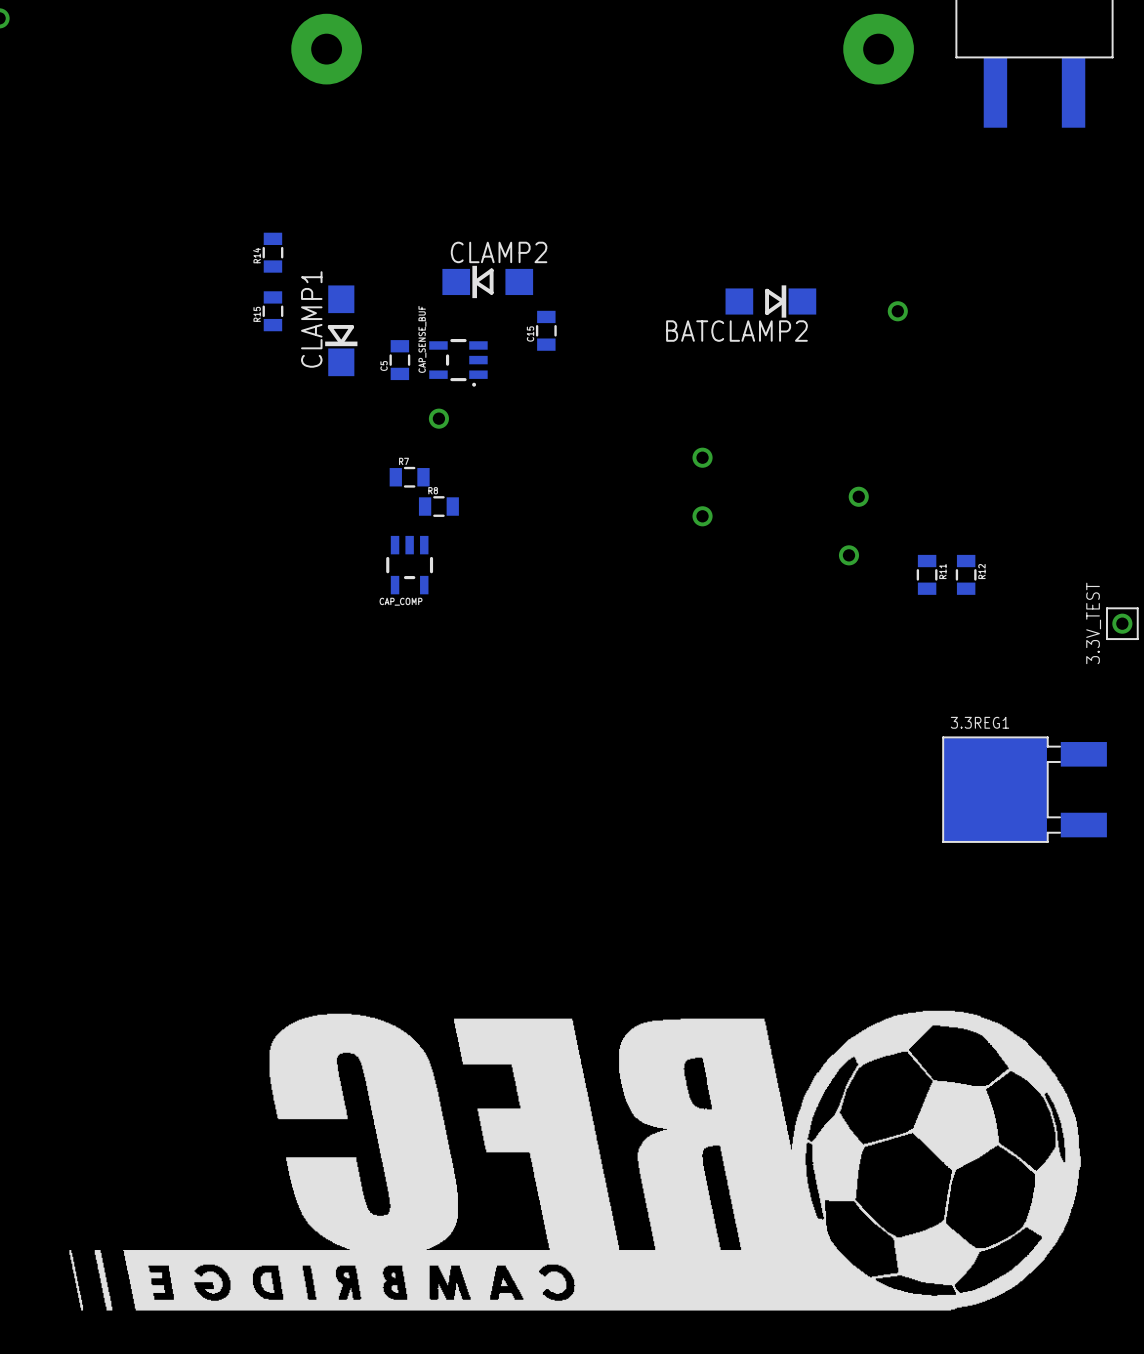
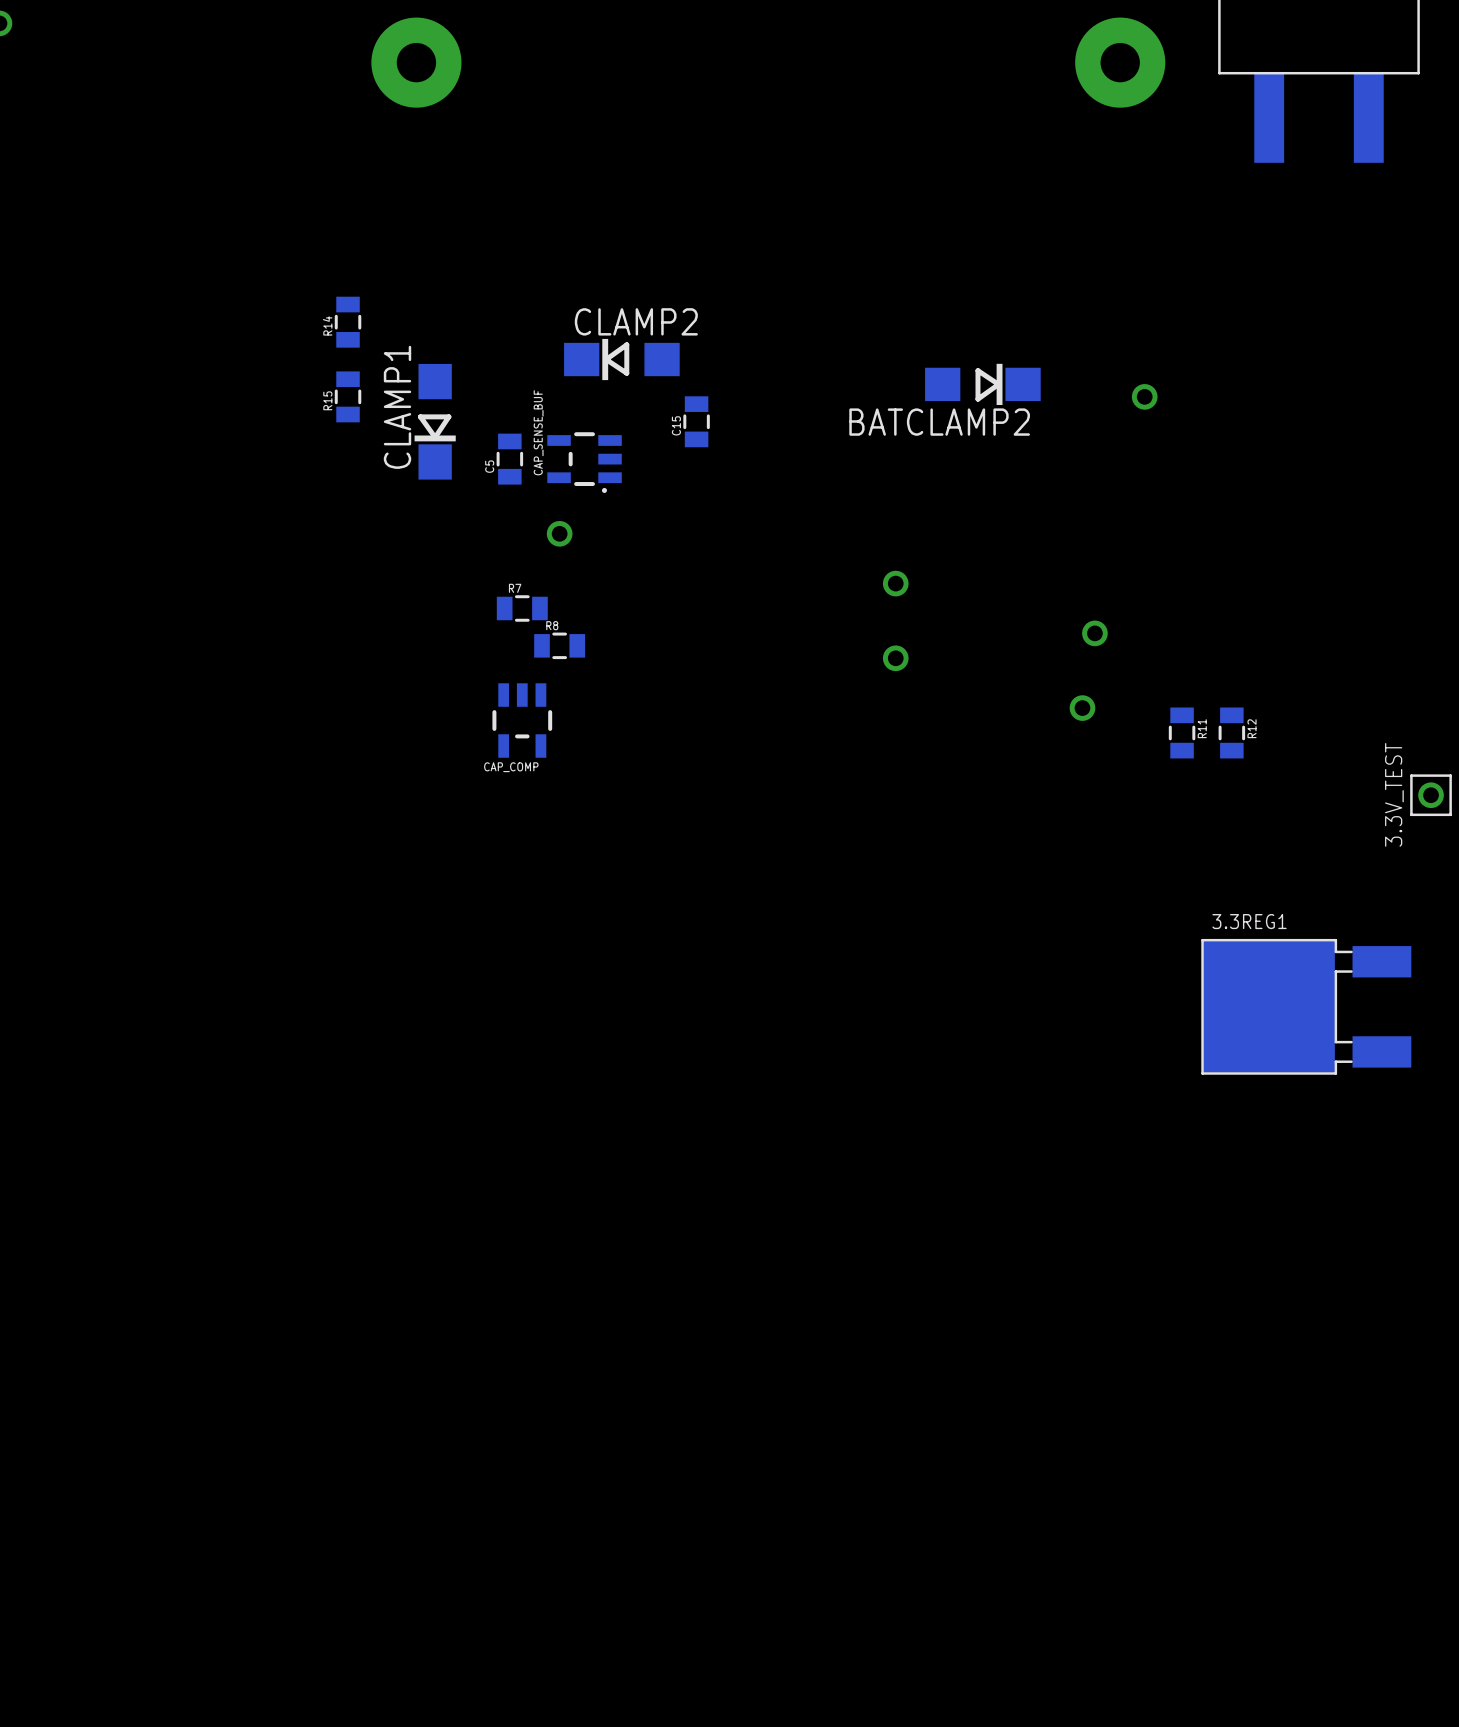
drawing: [123, 1010, 1081, 1311] -> none
drawing: [69, 1250, 84, 1311] -> none
drawing: [94, 1250, 113, 1311] -> none

